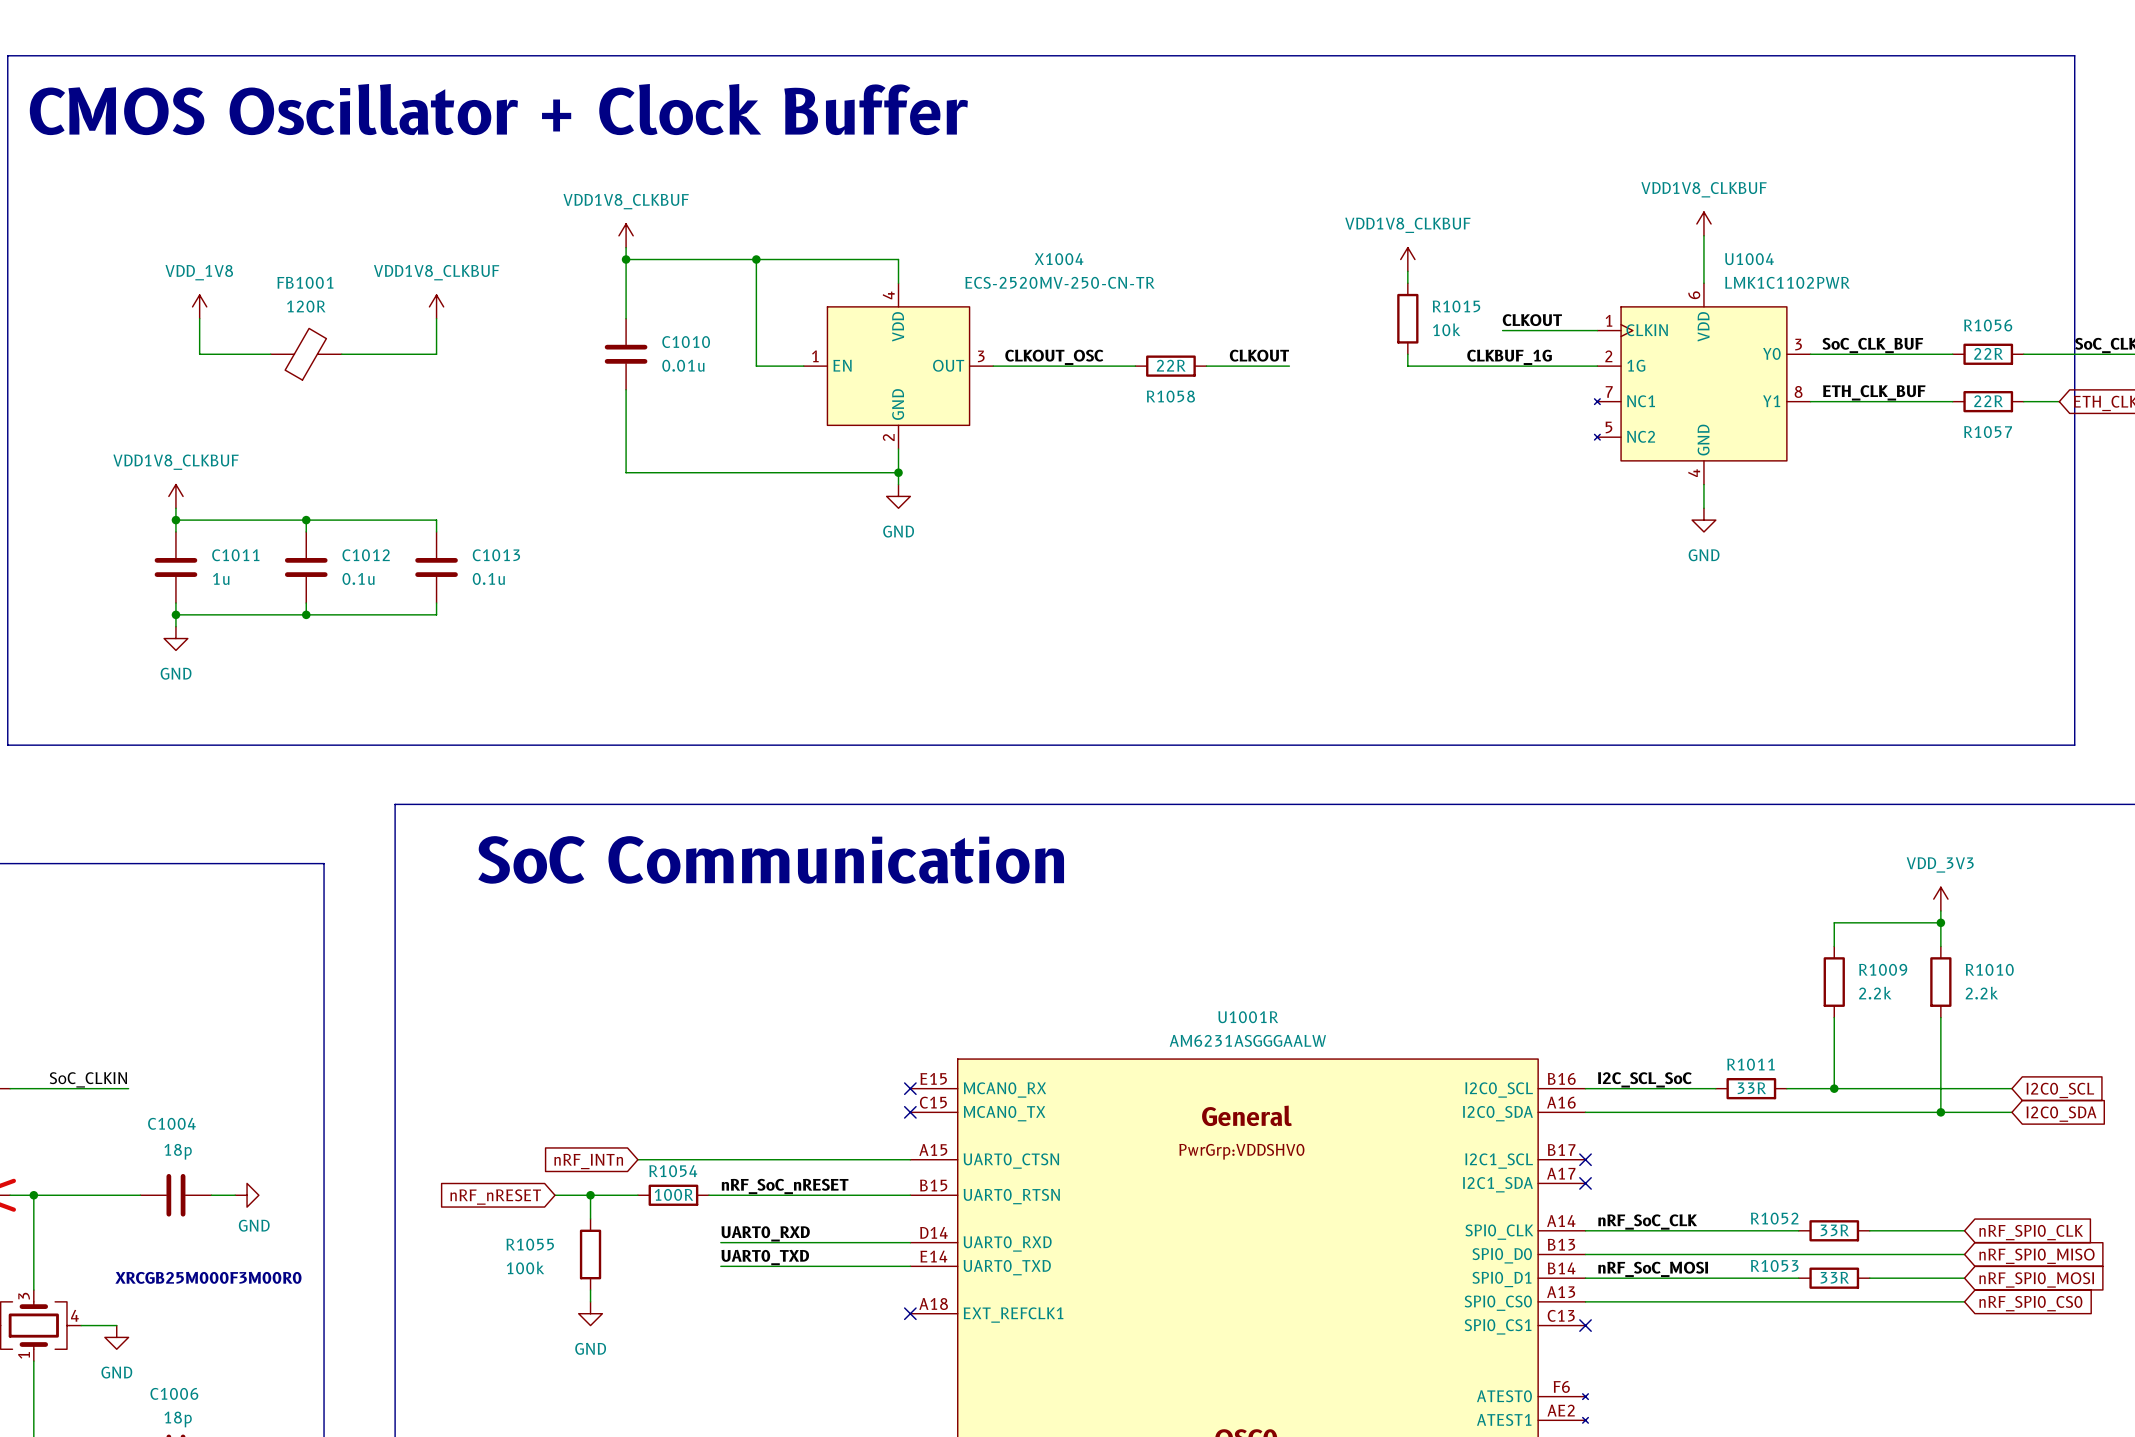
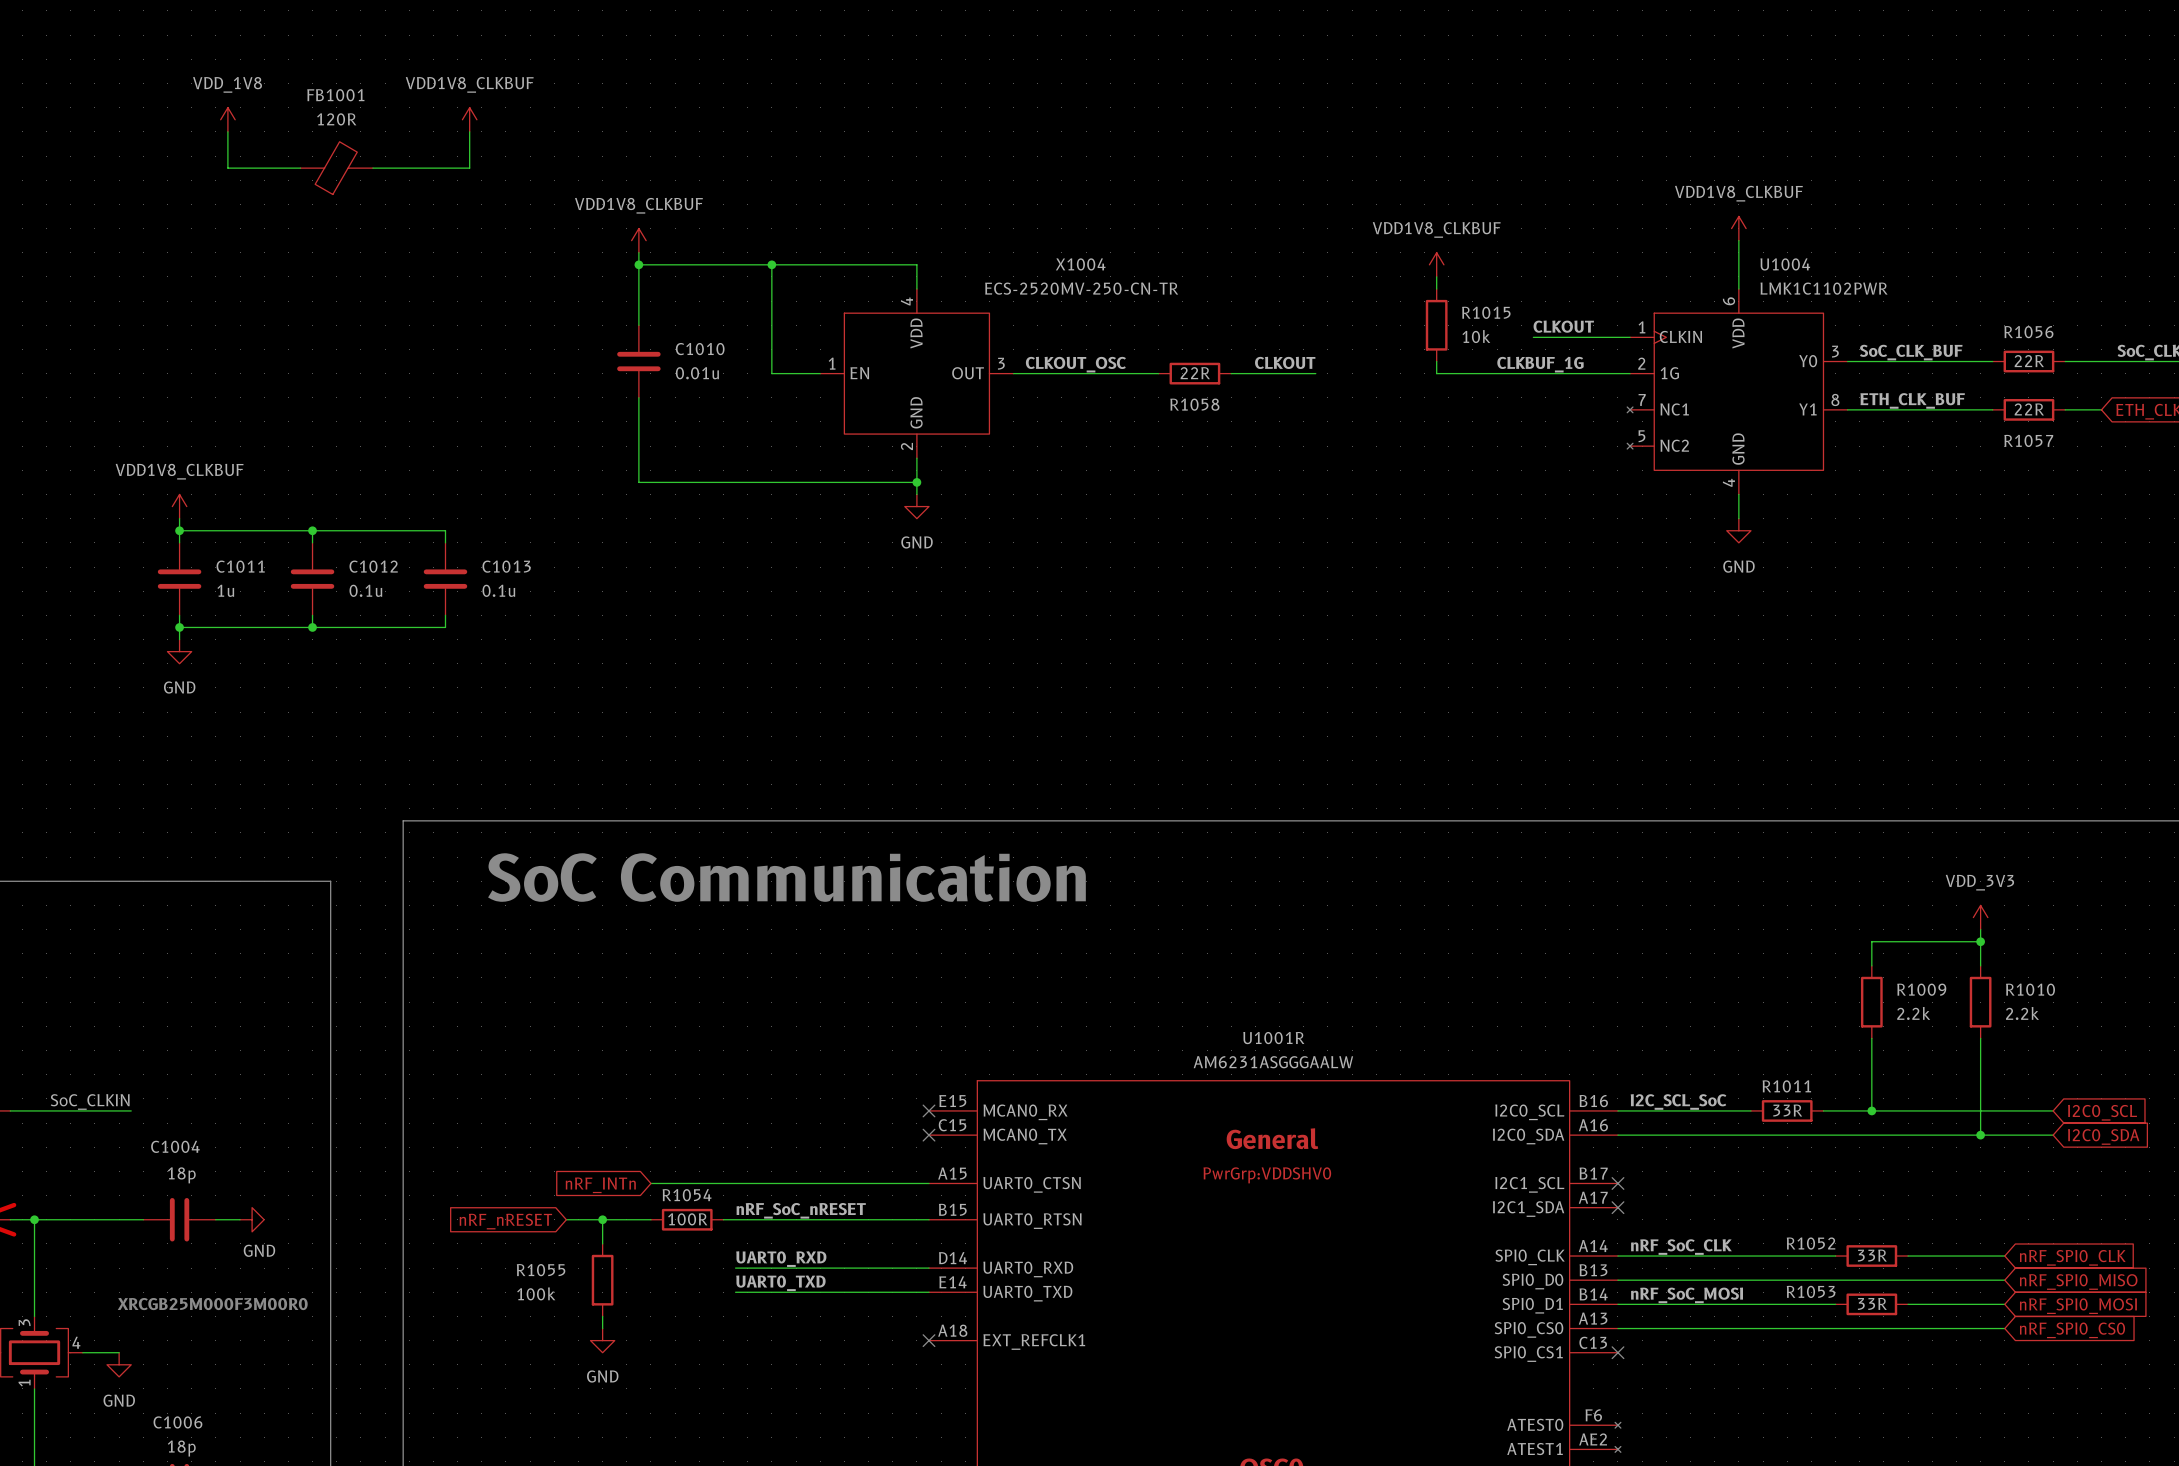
line: (7, 55) (2074, 55) (2074, 745) (7, 745) (7, 55) -> none
text: CMOS Oscillator + Clock Buffer (498, 109) -> none
power symbol position: VDD_1V8 (199, 306) -> VDD_1V8 (227, 119)
power symbol position: VDD1V8_CLKBUF (436, 306) -> VDD1V8_CLKBUF (469, 119)
wire: (199, 318) (199, 354) (270, 354) -> (227, 131) (227, 168) (300, 168)
wire: (436, 318) (436, 354) (341, 354) -> (469, 131) (469, 168) (372, 168)
FB1001 position: (306, 354) -> (336, 168)

